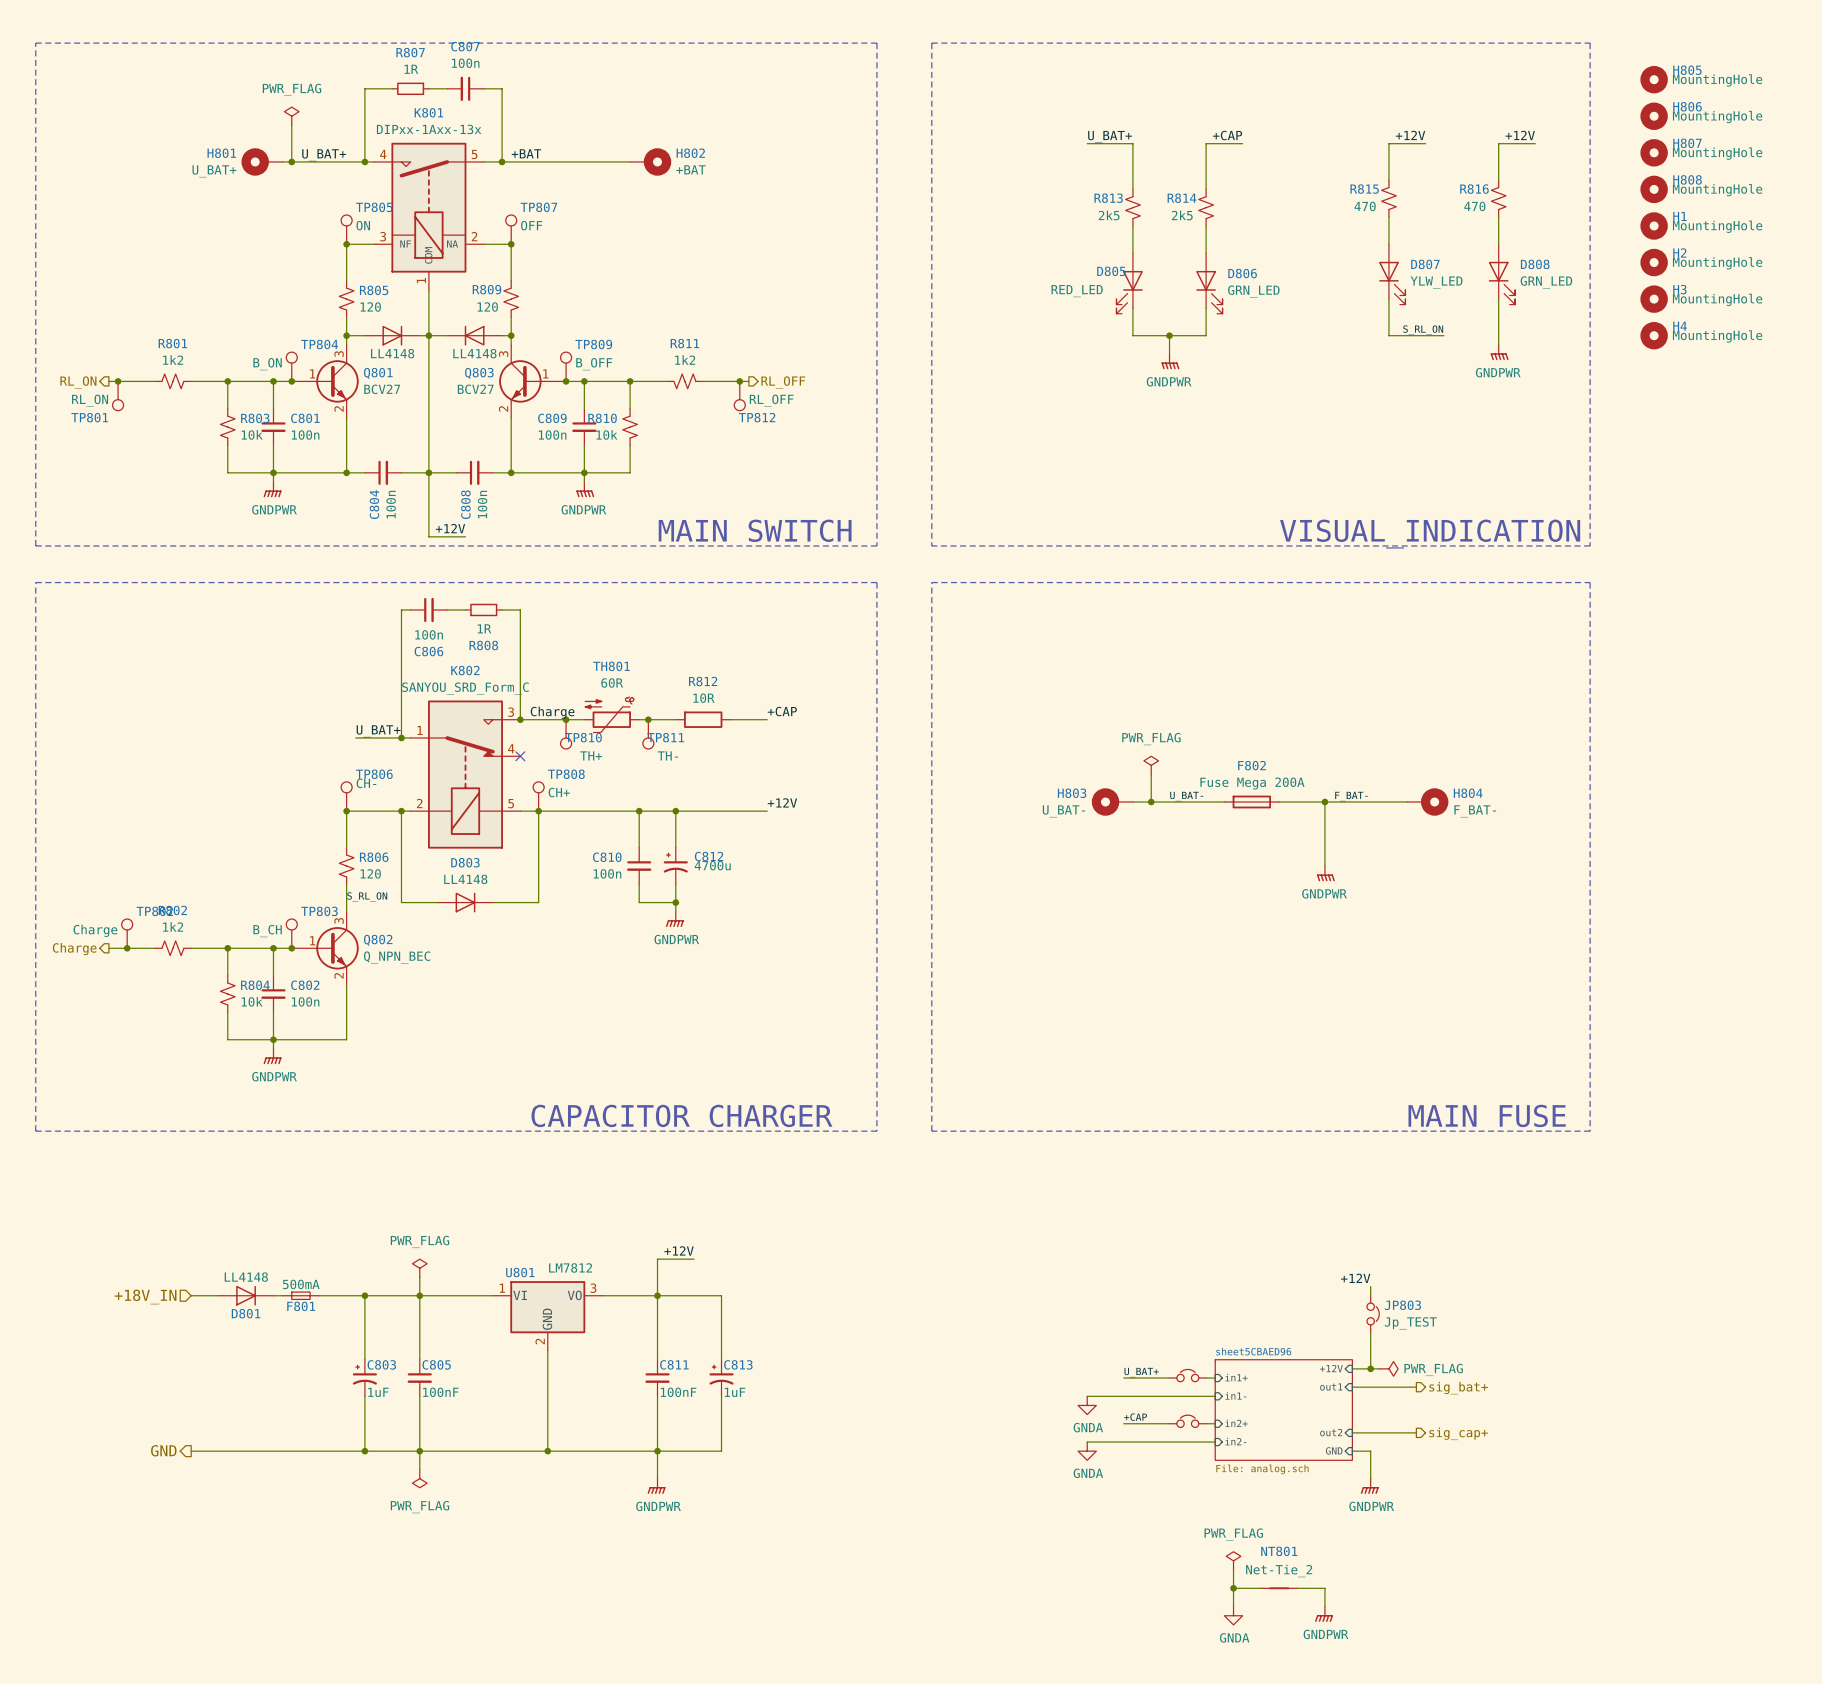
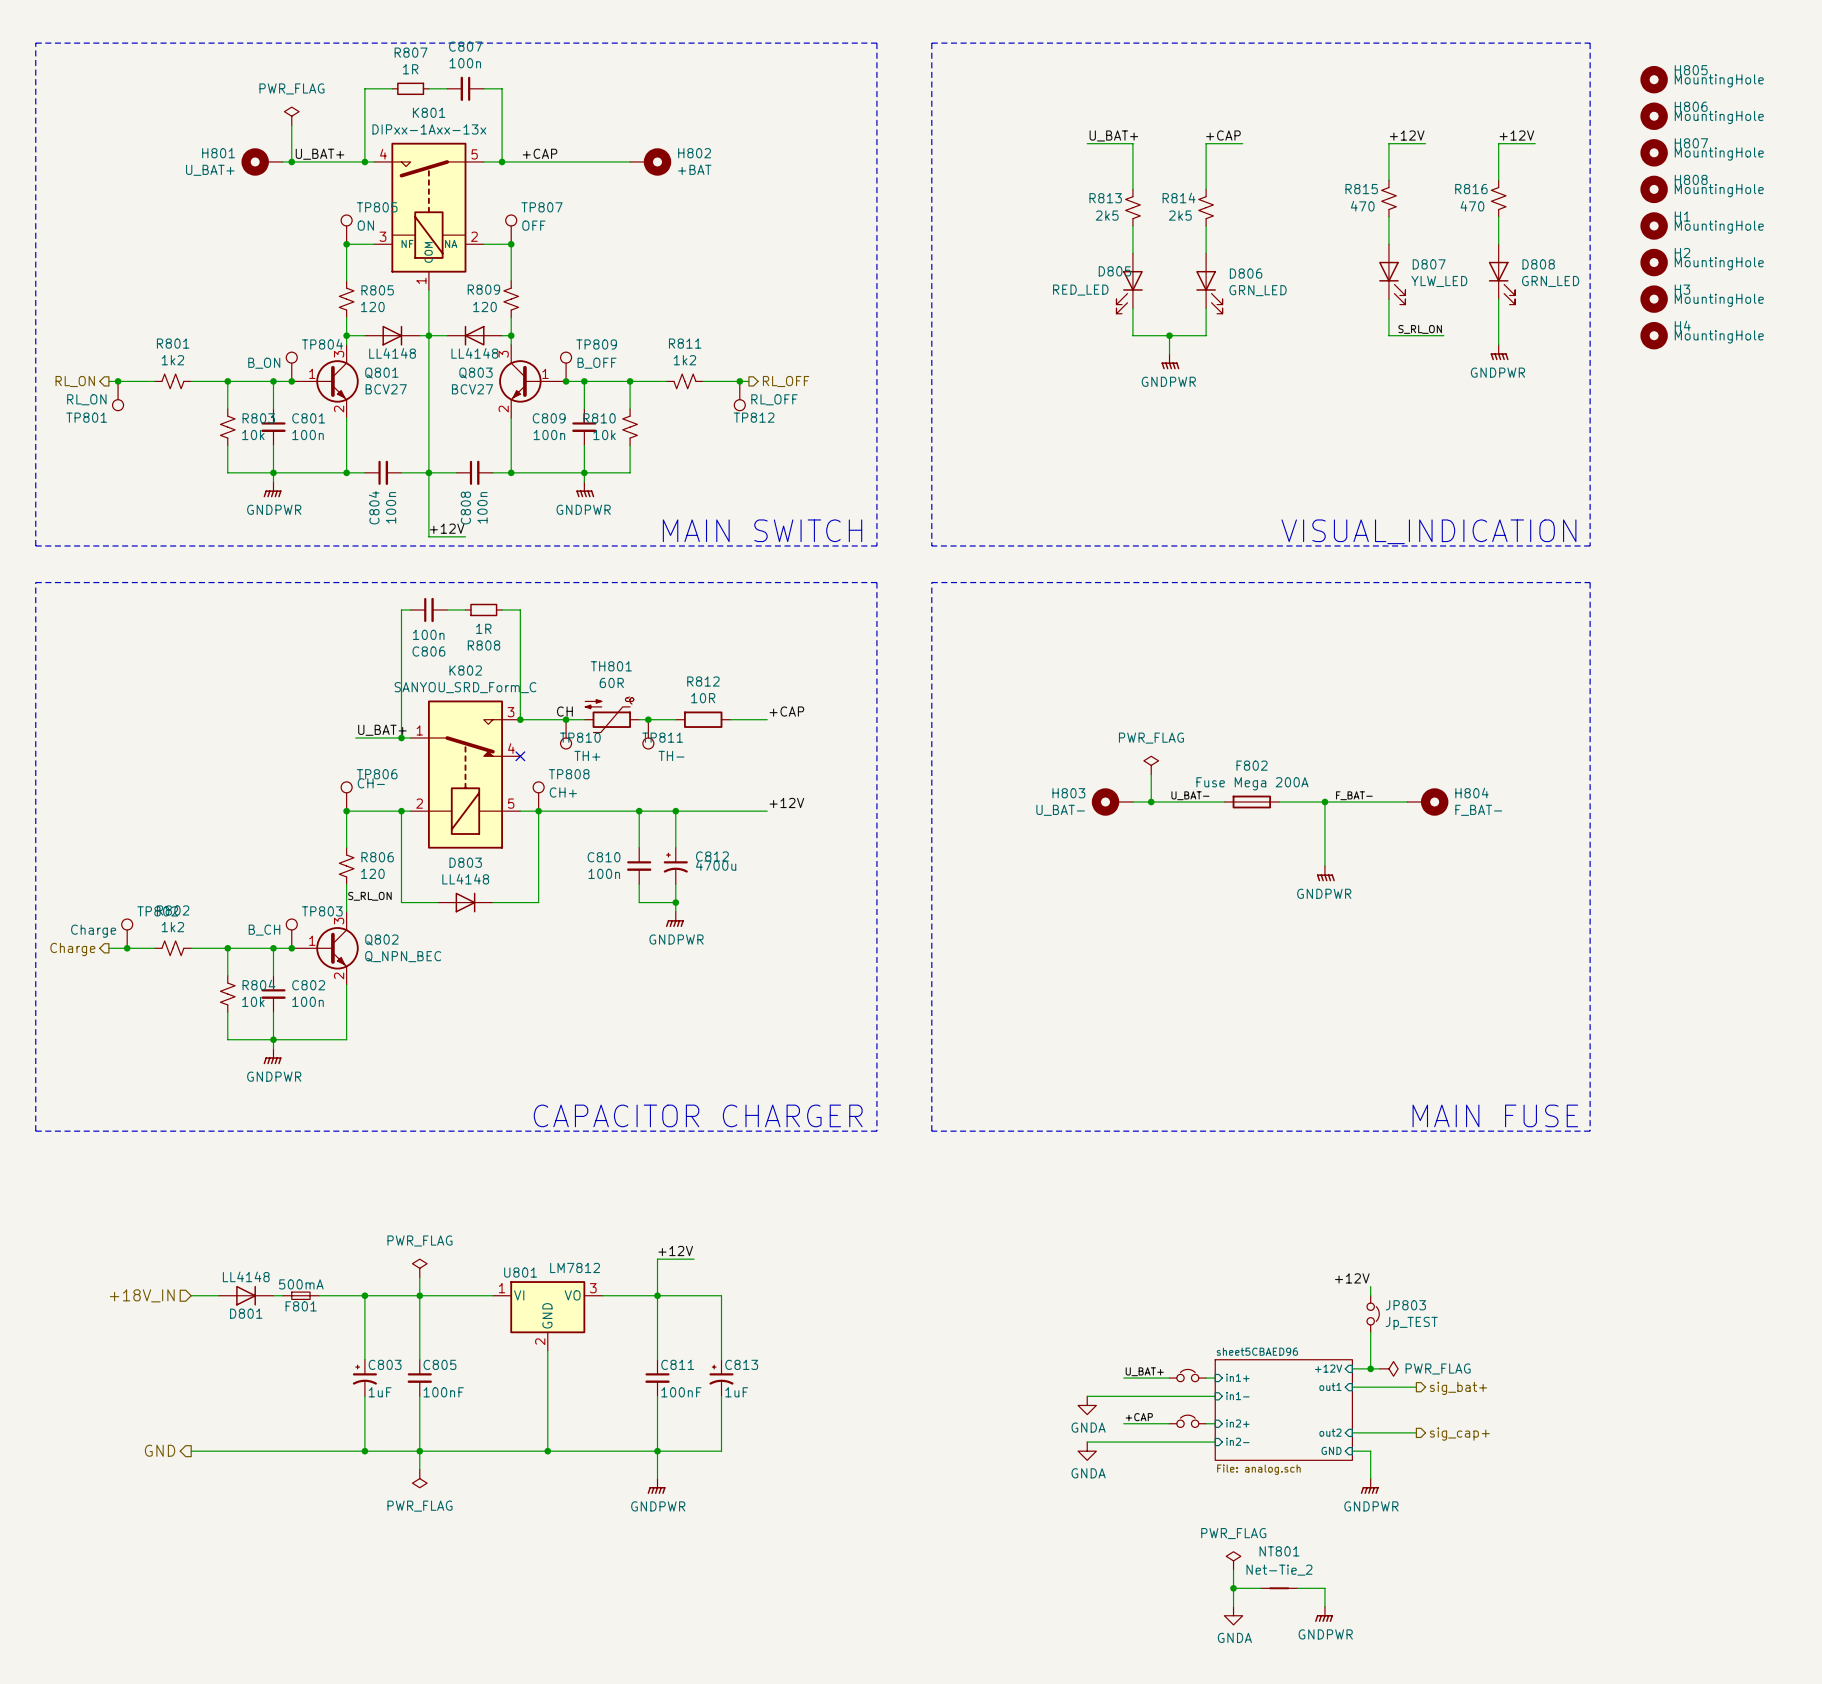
label: +BAT (526, 153) -> none
label: none -> +CAP (540, 153)
label: Charge (552, 712) -> CH (564, 711)

